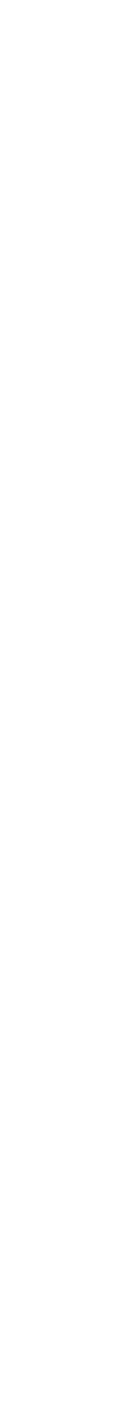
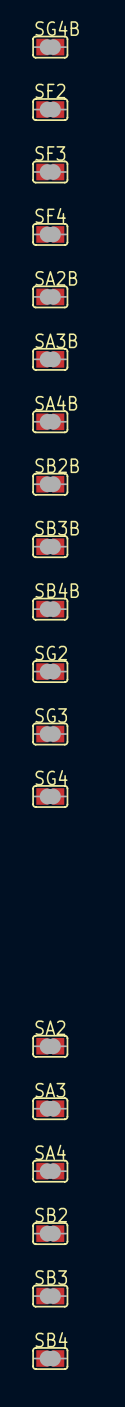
SG4B: none -> (50, 47)
SF2: none -> (50, 109)
SF3: none -> (50, 171)
SF4: none -> (50, 234)
SA2B: none -> (50, 296)
SA3B: none -> (50, 359)
SA4B: none -> (50, 421)
SB2B: none -> (50, 484)
SB3B: none -> (50, 546)
SB4B: none -> (50, 609)
SG2: none -> (50, 671)
SG3: none -> (50, 734)
SG4: none -> (50, 796)
SA2: none -> (50, 1046)
SA3: none -> (50, 1108)
SA4: none -> (50, 1171)
SB2: none -> (50, 1233)
SB3: none -> (50, 1296)
SB4: none -> (50, 1358)

